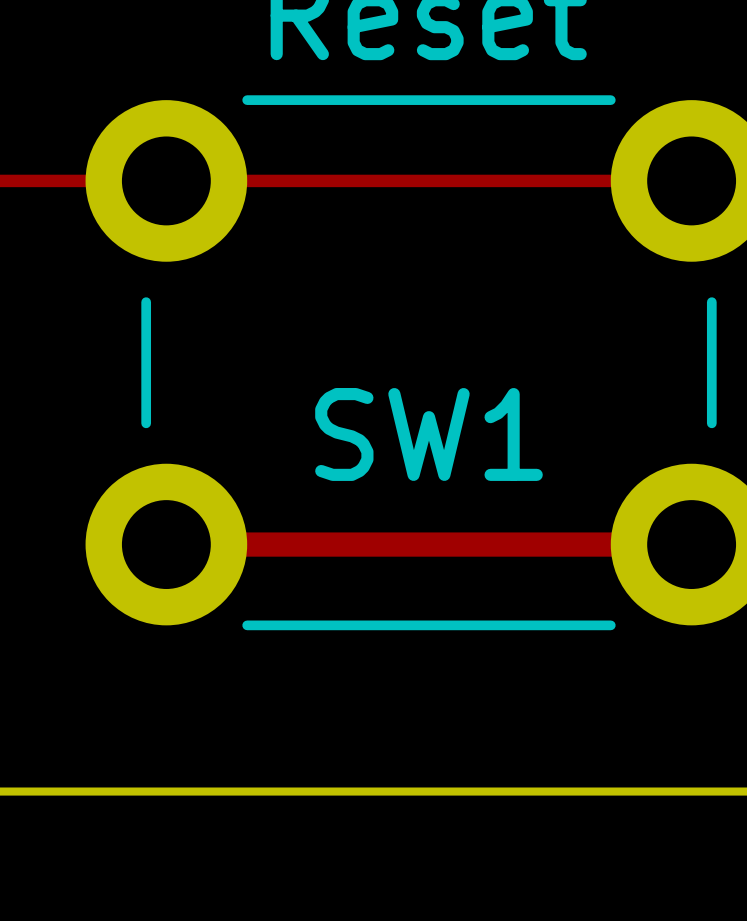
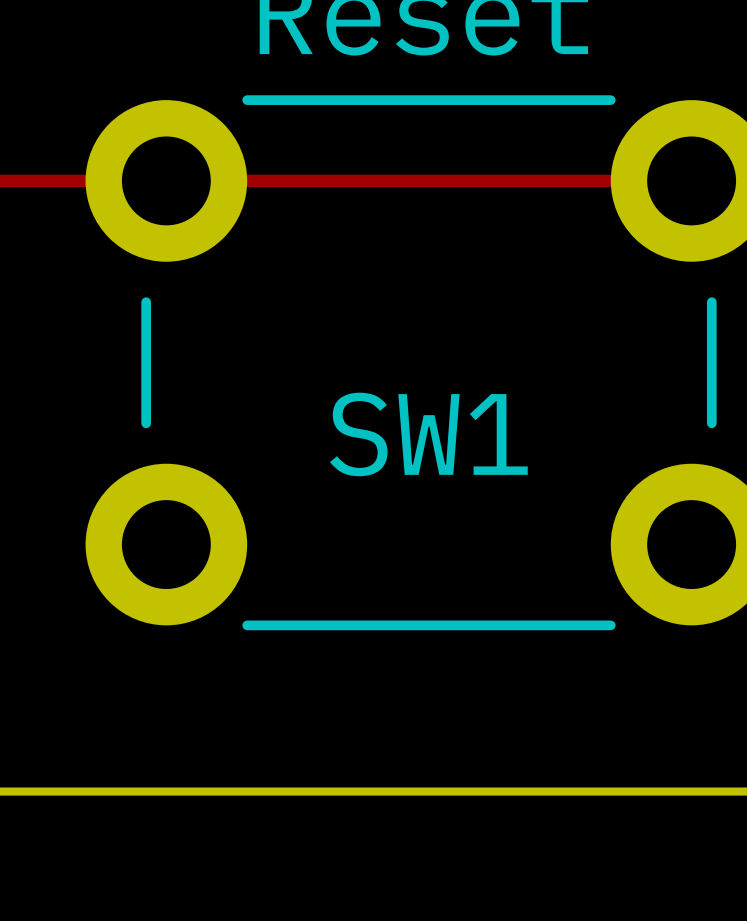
track: (166, 544) (691, 544) -> none

